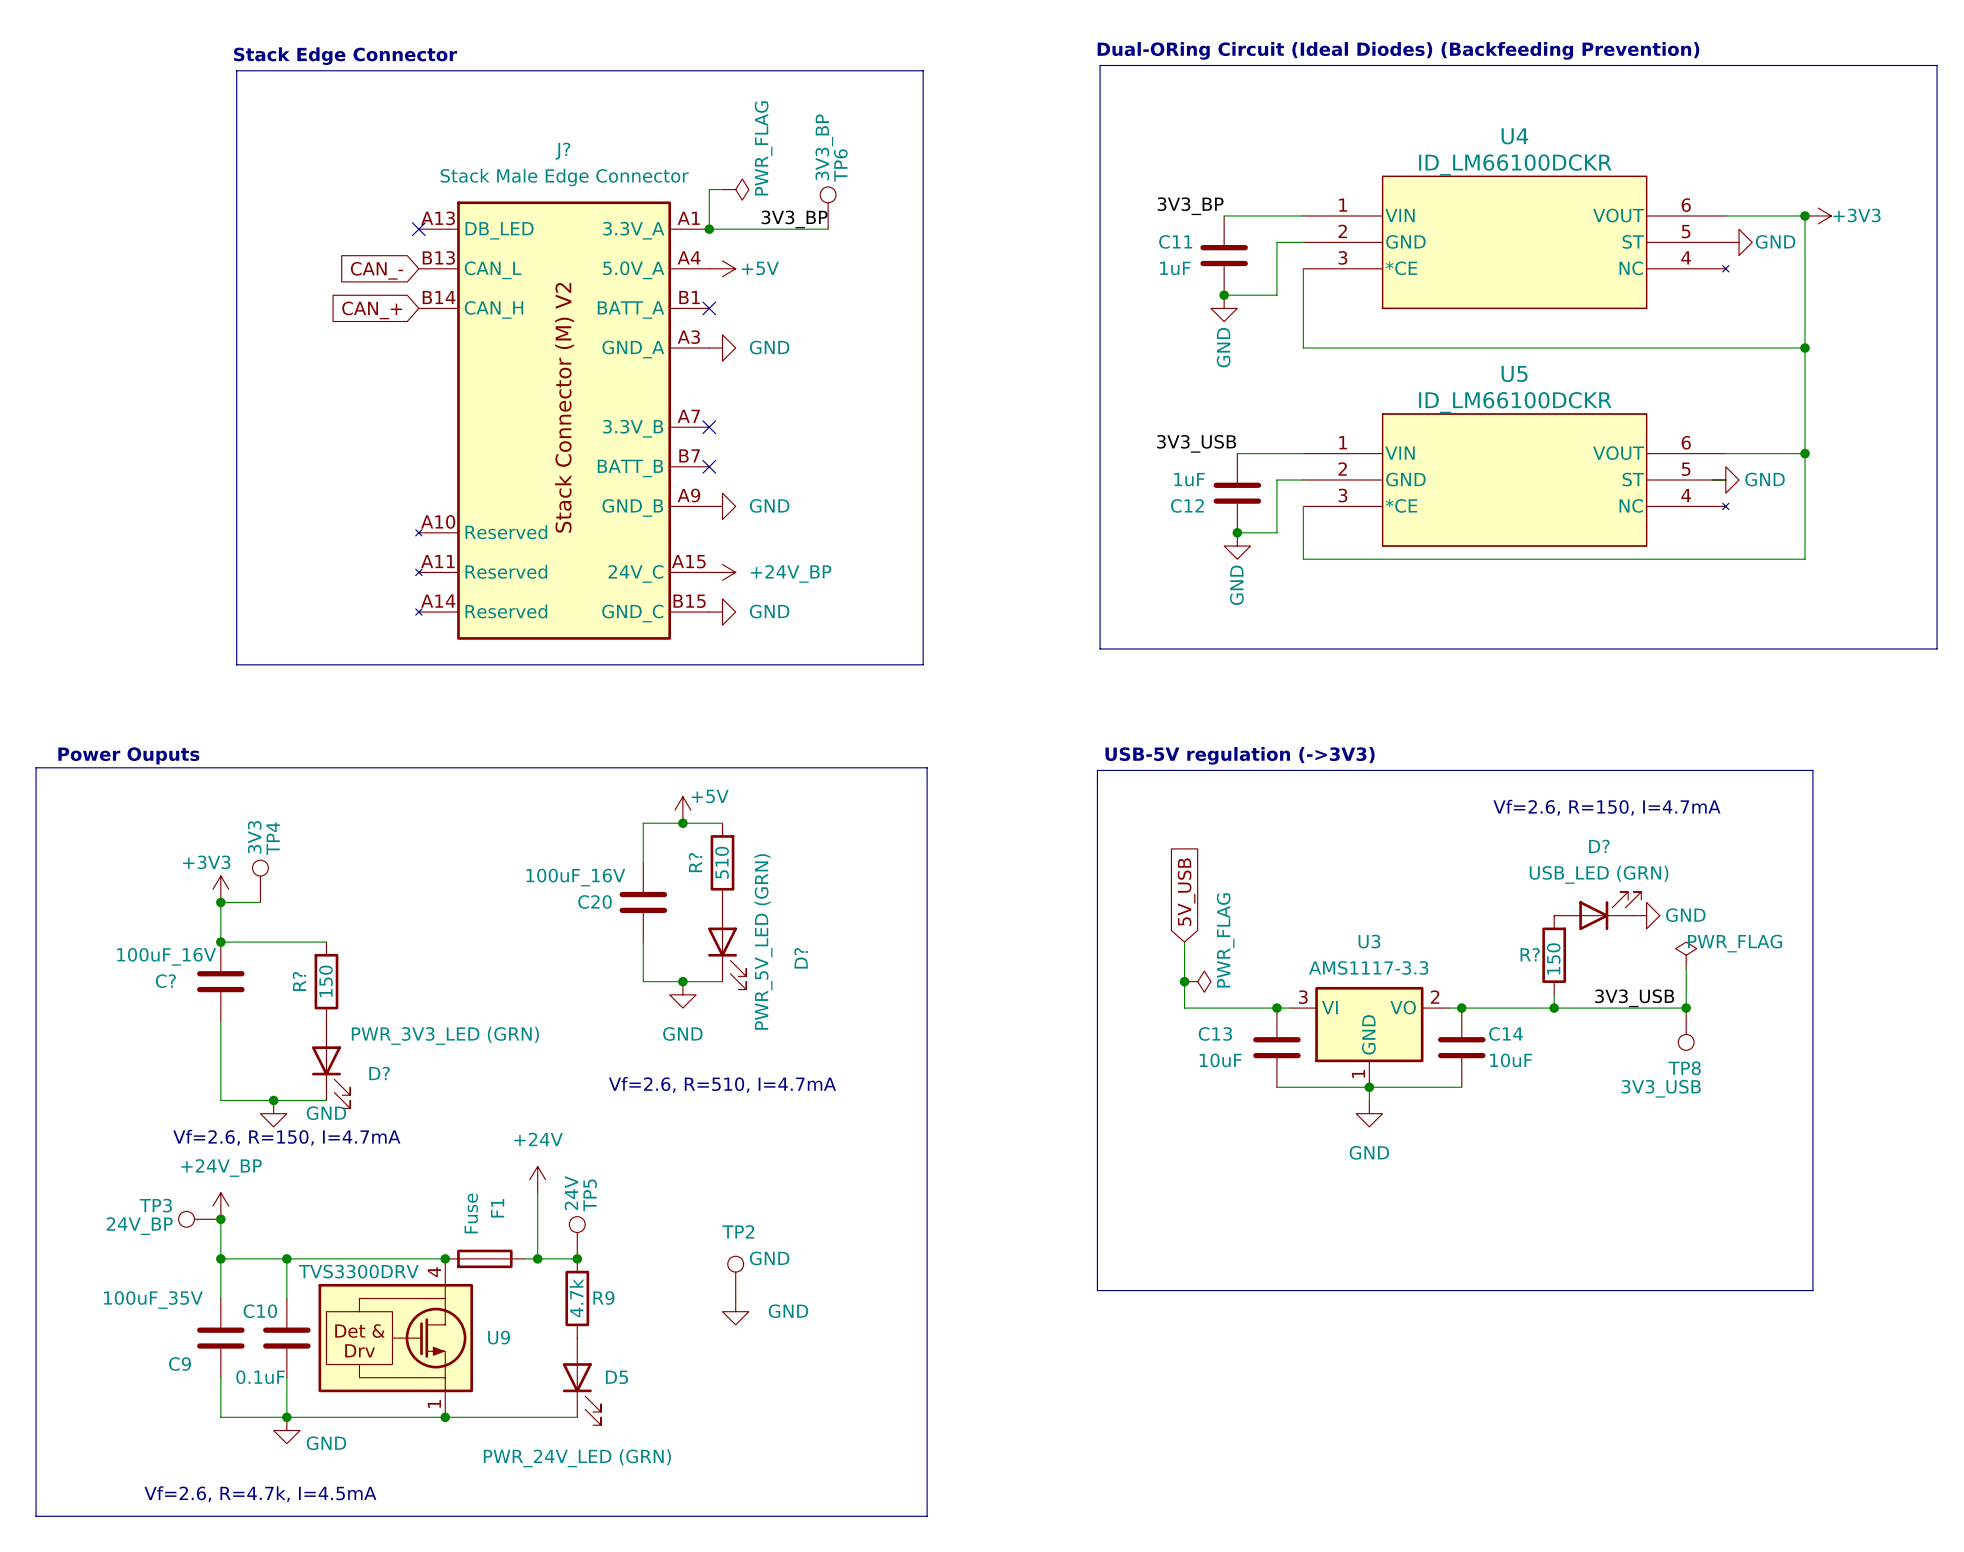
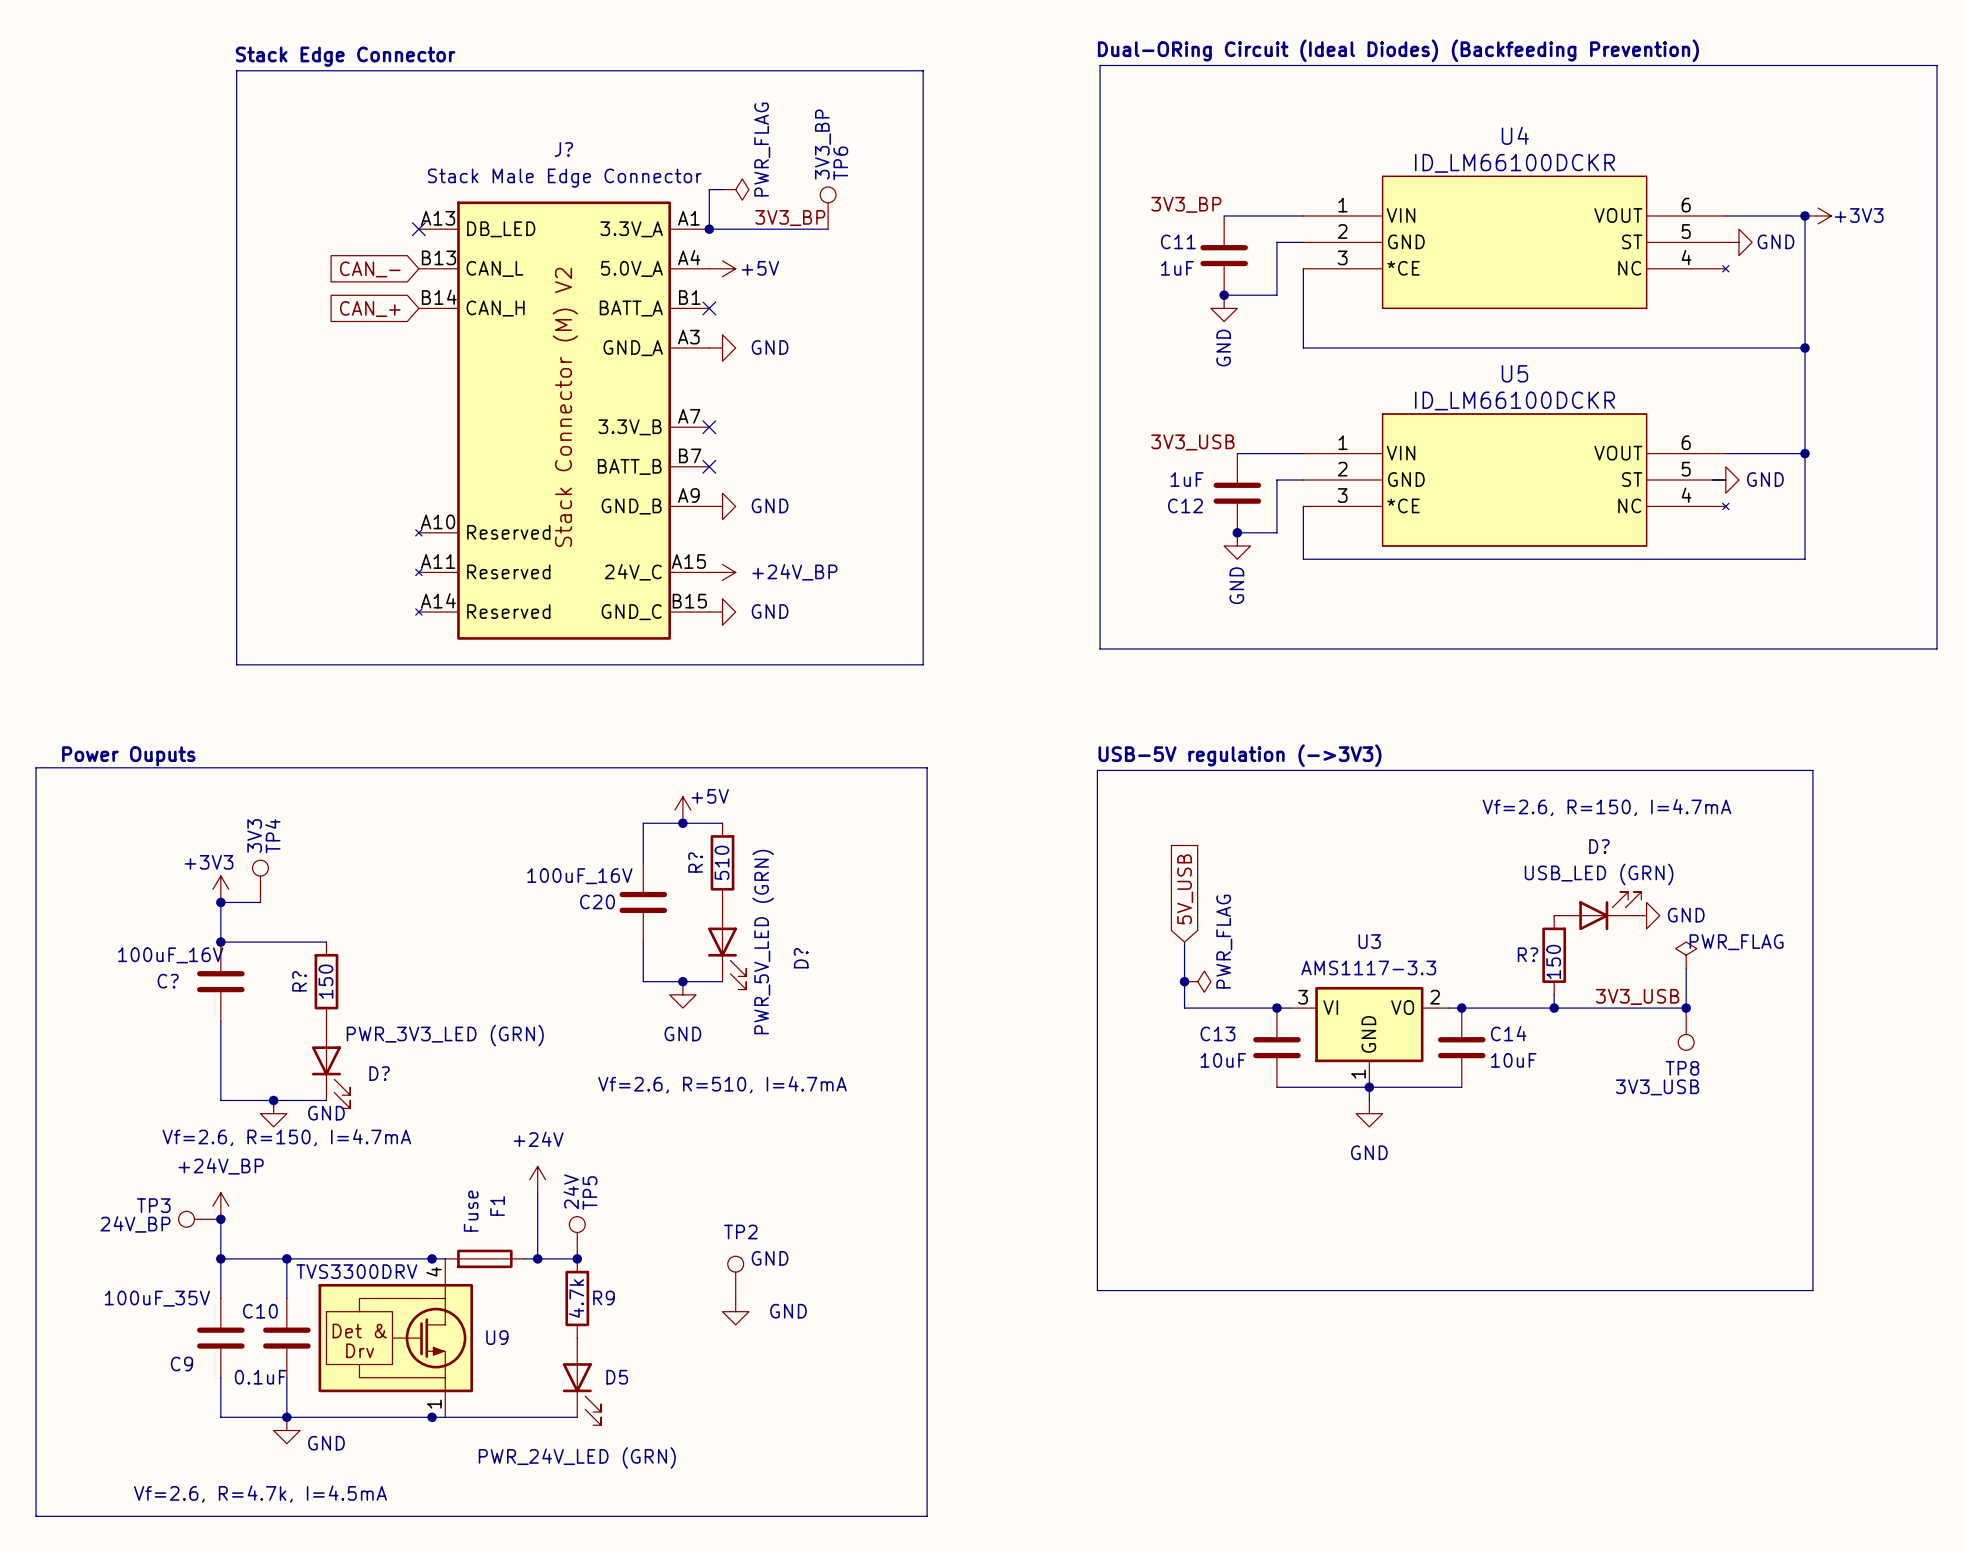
junction position: (445, 1258) -> (432, 1258)
junction position: (445, 1417) -> (432, 1417)

